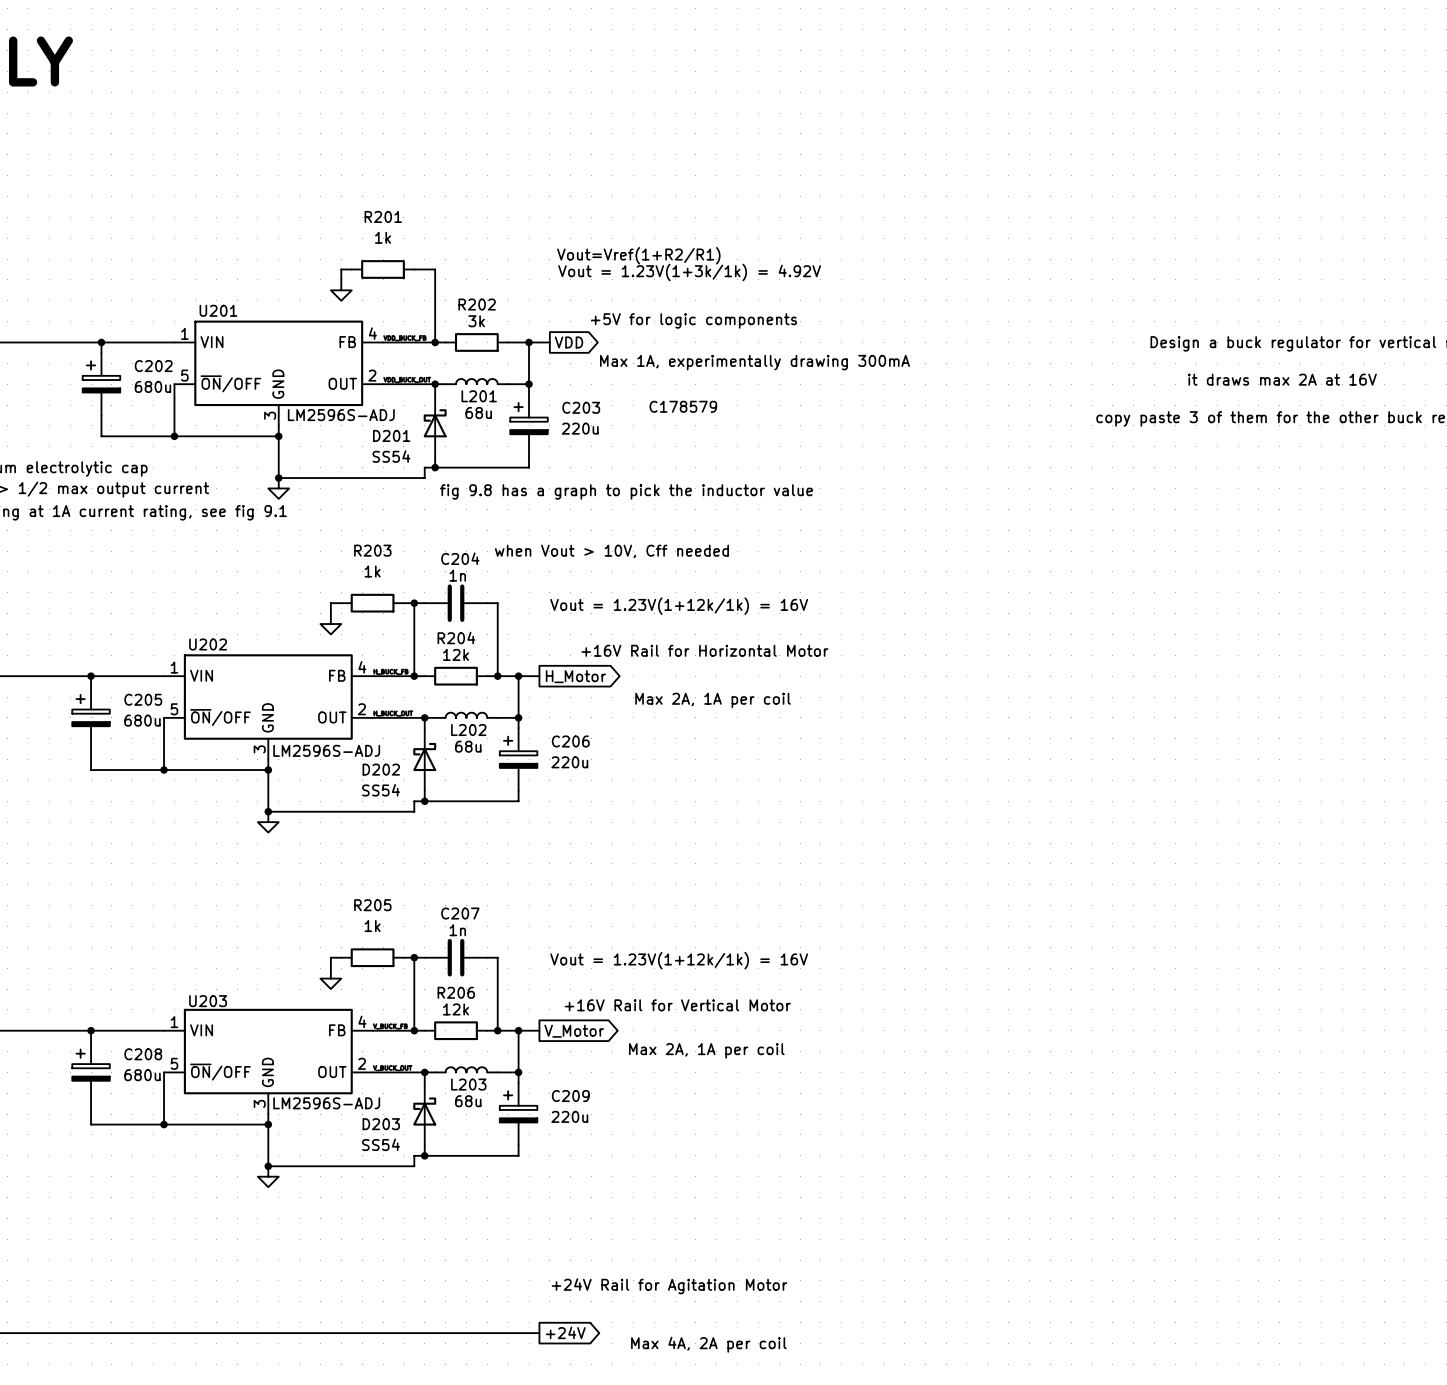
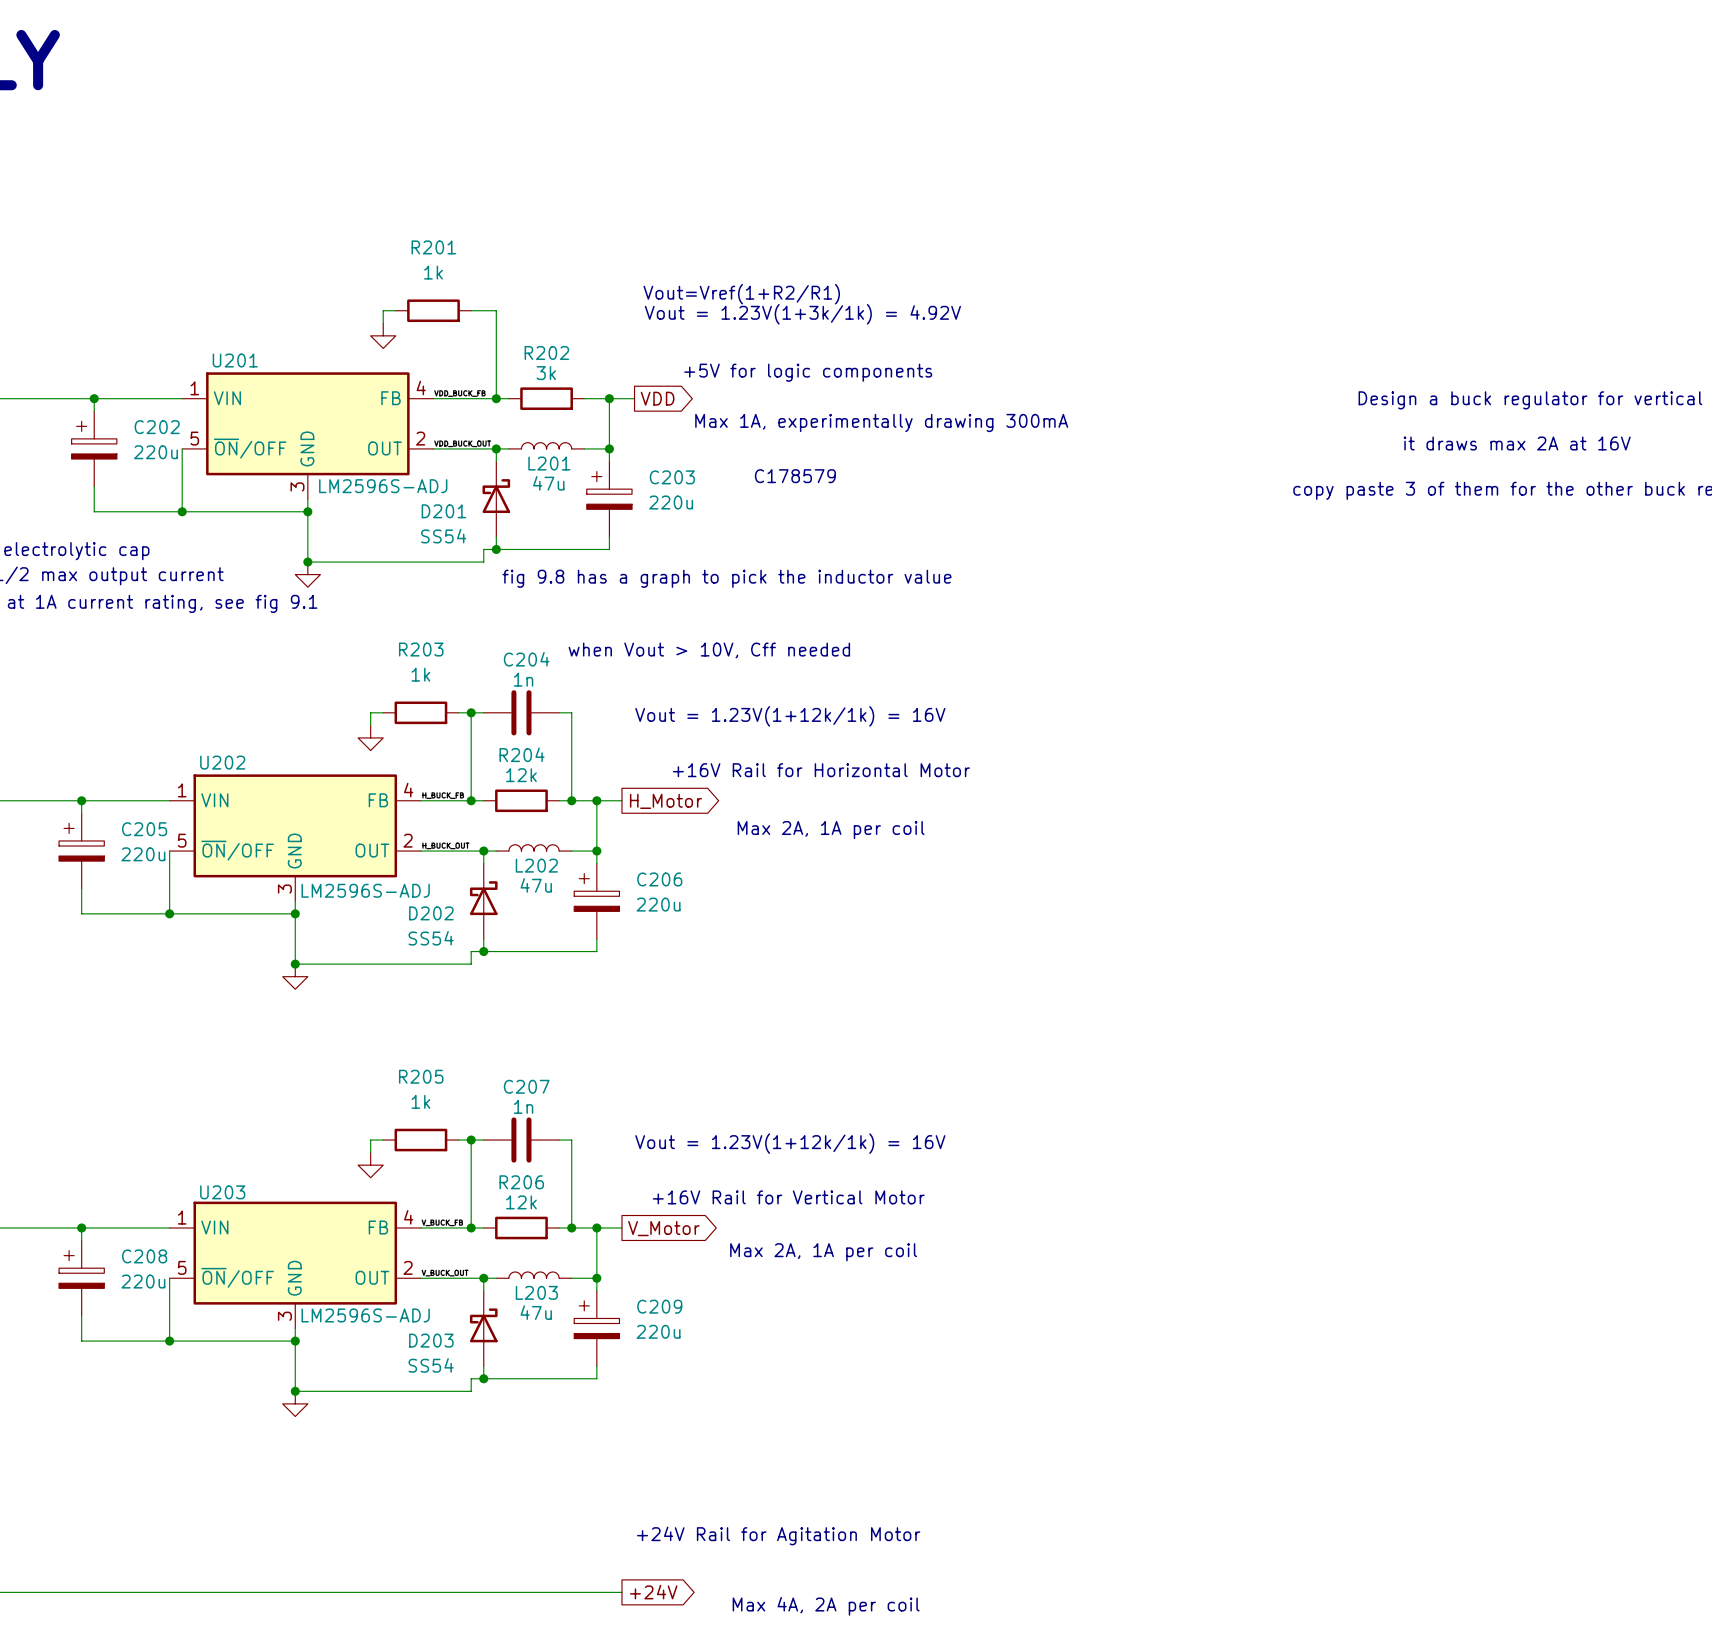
C202 value: 680u (152, 386) -> 220u (155, 452)
L201 value: 68u (478, 413) -> 47u (548, 483)
C205 value: 680u (142, 720) -> 220u (143, 854)
L202 value: 68u (468, 746) -> 47u (536, 885)
C208 value: 680u (142, 1075) -> 220u (143, 1281)
L203 value: 68u (468, 1101) -> 47u (536, 1312)

